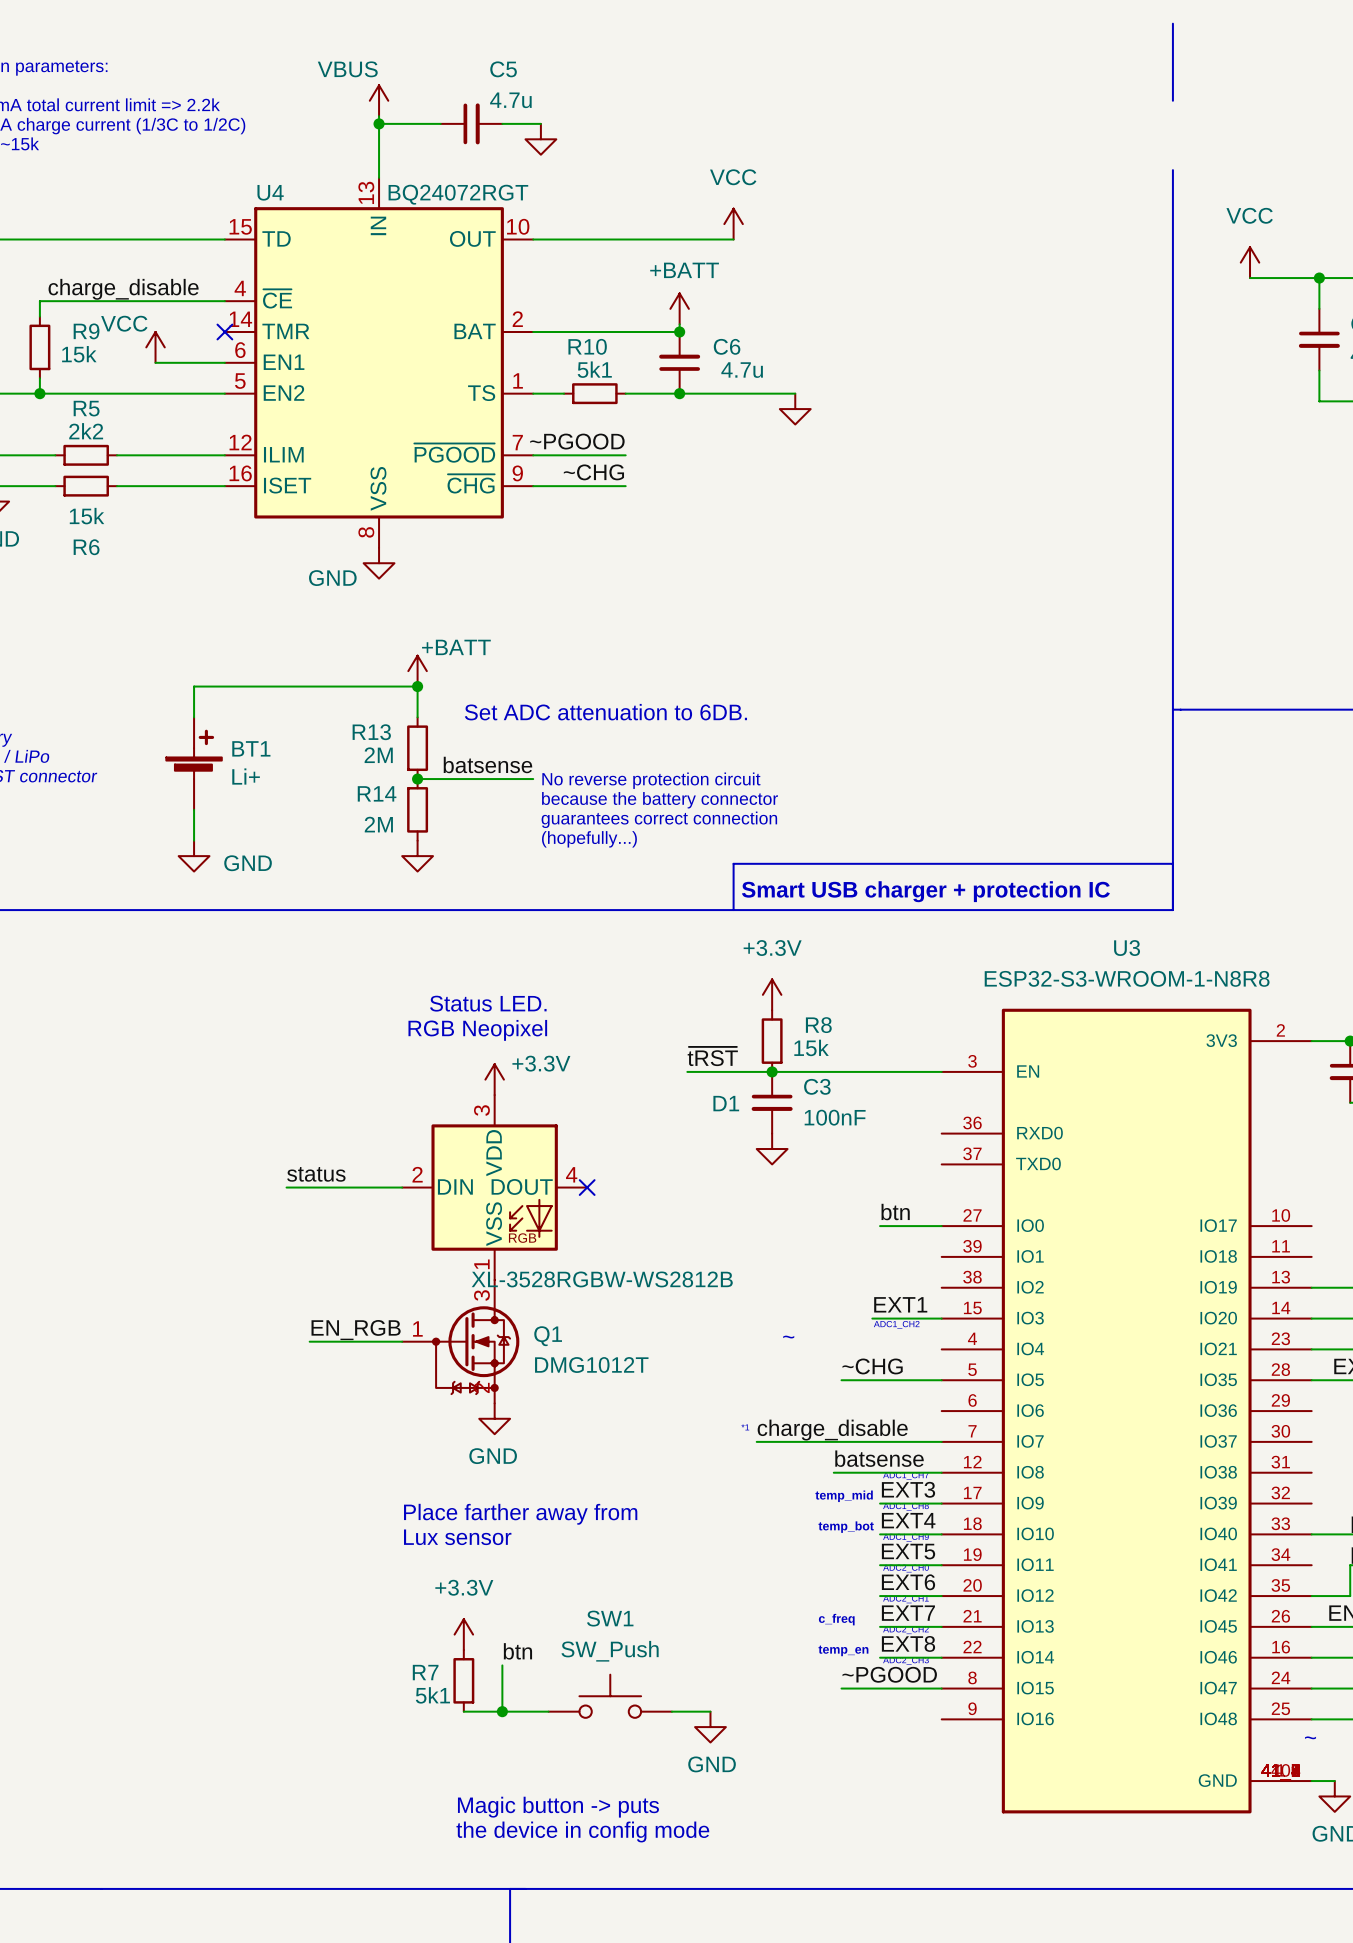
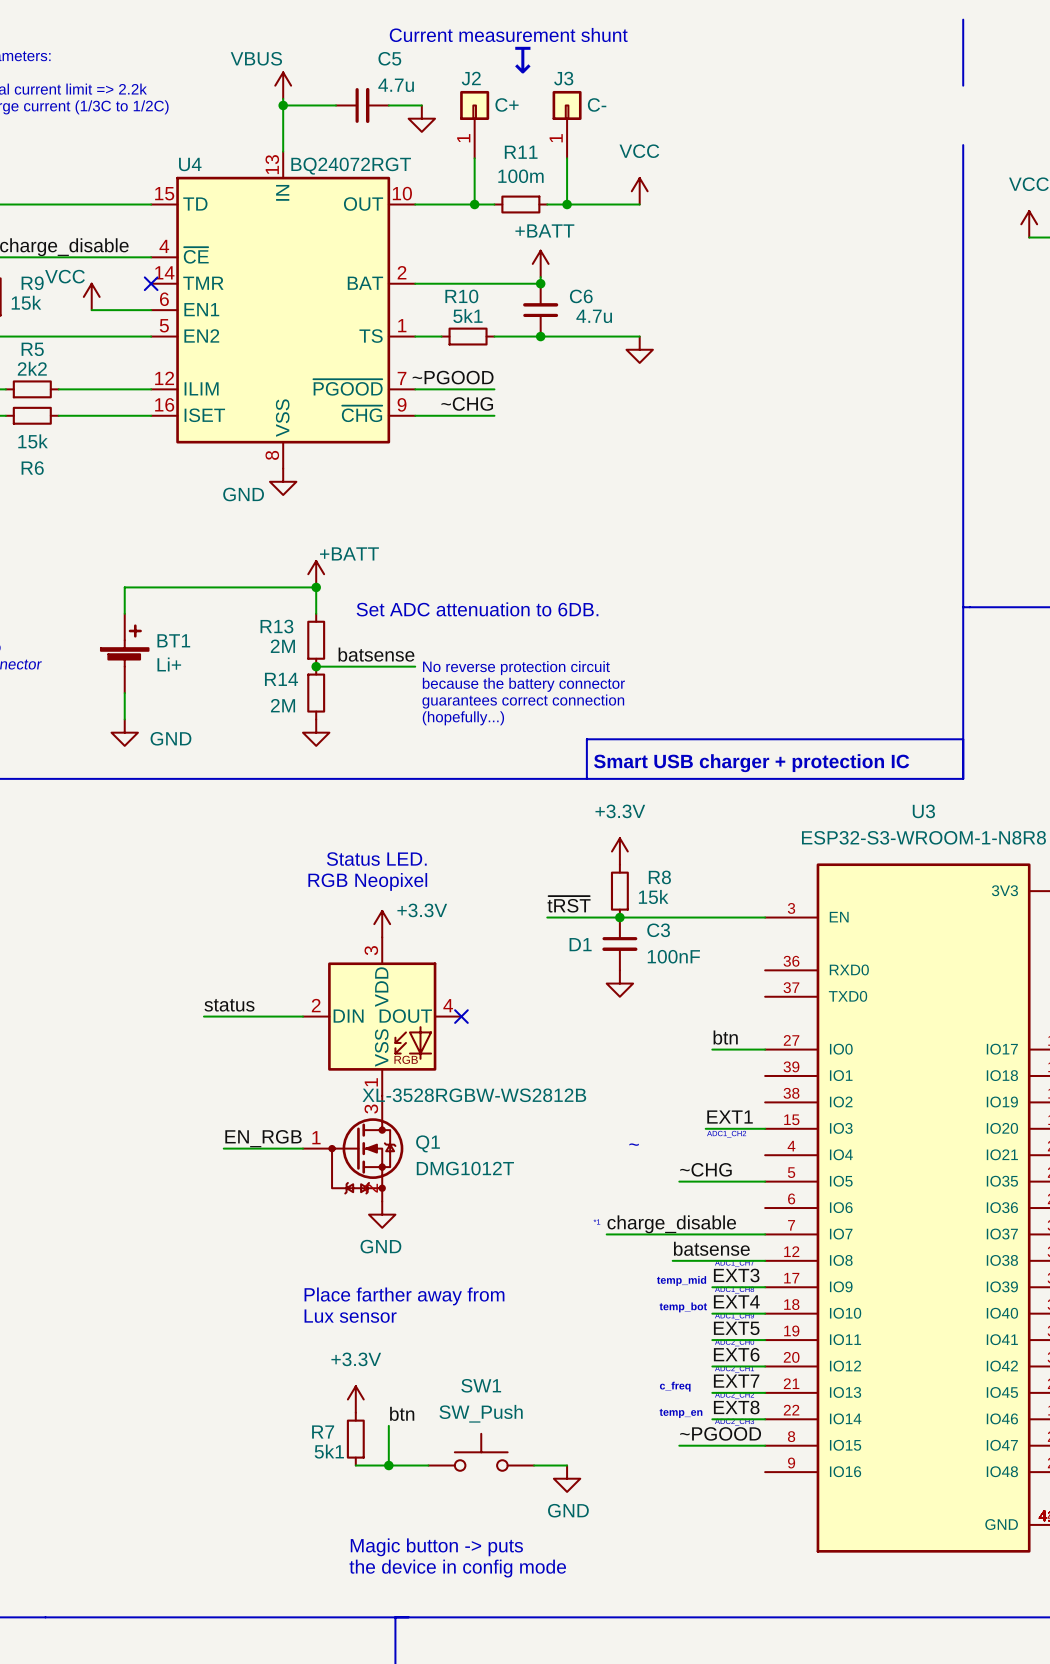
text: none -> Current measurement shunt (508, 34)
text: none -> ↧ (522, 60)
J2: none -> C+ (474, 124)
J3: none -> C- (567, 124)
wire: none -> (474, 158) (474, 204)
wire: none -> (567, 158) (567, 204)
power symbol position: VCC (733, 224) -> VCC (639, 191)
junction: none -> (474, 204)
wire: (625, 239) (687, 239) -> (586, 204) (639, 204)
R11: none -> 100m (520, 204)
junction: none -> (567, 204)

